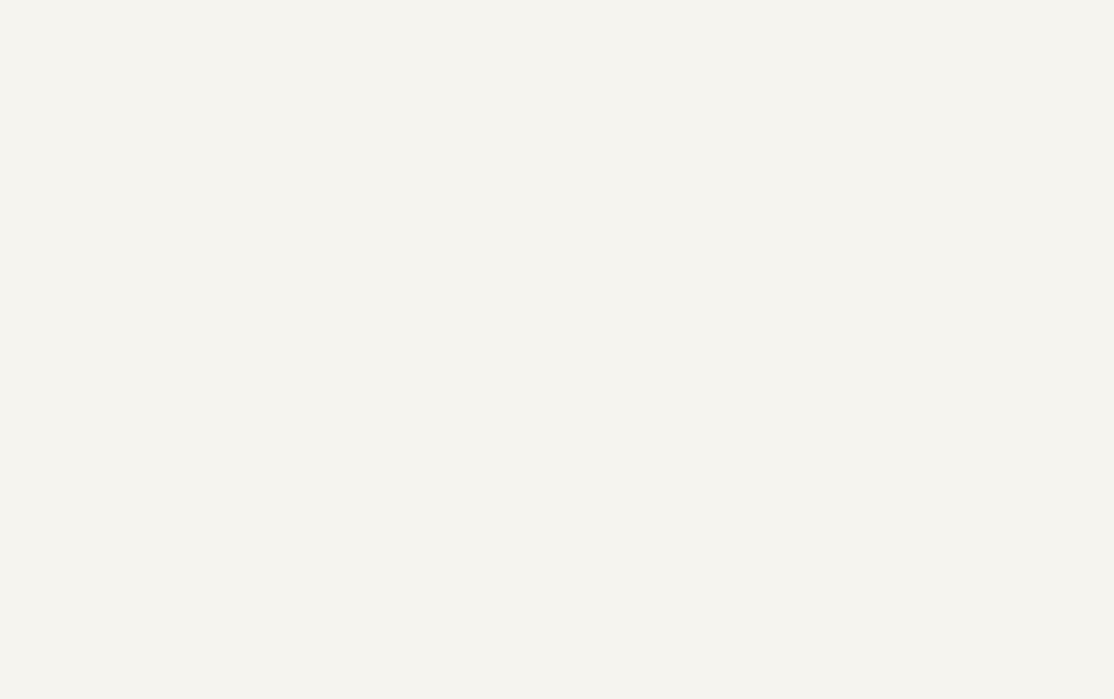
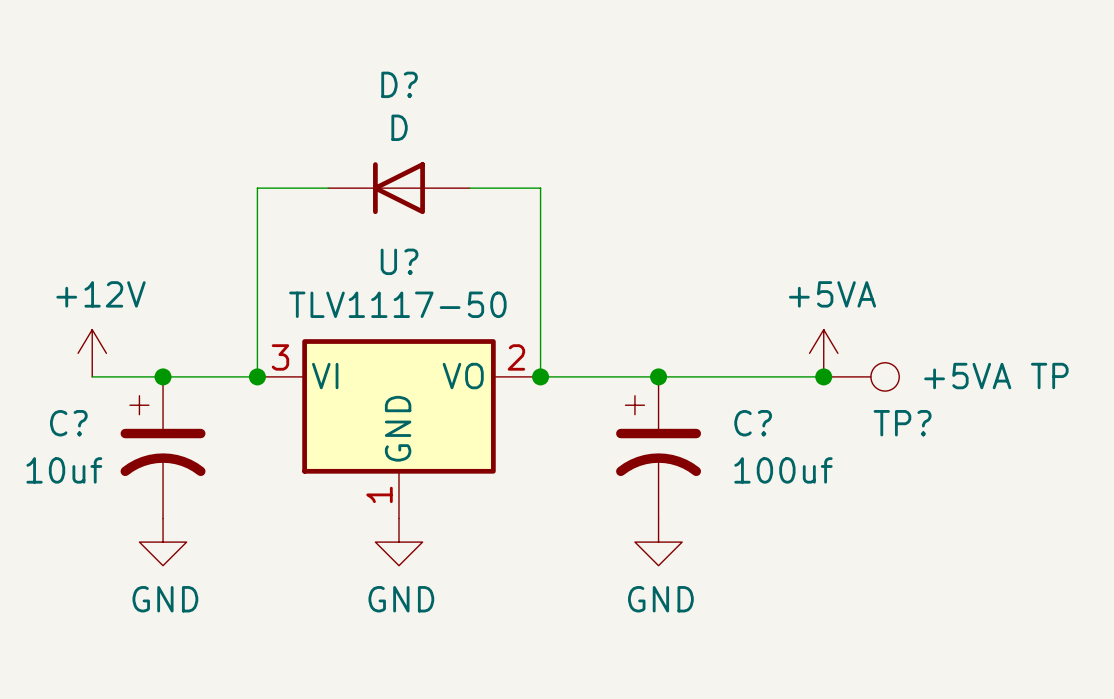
wire: none -> (328, 188) (257, 188) (257, 376) (92, 376)
D?: none -> D (398, 188)
wire: none -> (469, 188) (540, 188) (540, 376) (823, 376)
power symbol: none -> +12V (92, 353)
power symbol: none -> +5VA (823, 353)
junction: none -> (163, 376)
junction: none -> (257, 376)
junction: none -> (540, 376)
junction: none -> (658, 376)
junction: none -> (823, 376)
TP?: none -> +5VA TP (861, 376)
U?: none -> TLV1117-50 (398, 428)
C?: none -> 10uf (163, 447)
C?: none -> 100uf (658, 447)
power symbol: none -> GND (163, 542)
power symbol: none -> GND (398, 542)
power symbol: none -> GND (658, 542)

